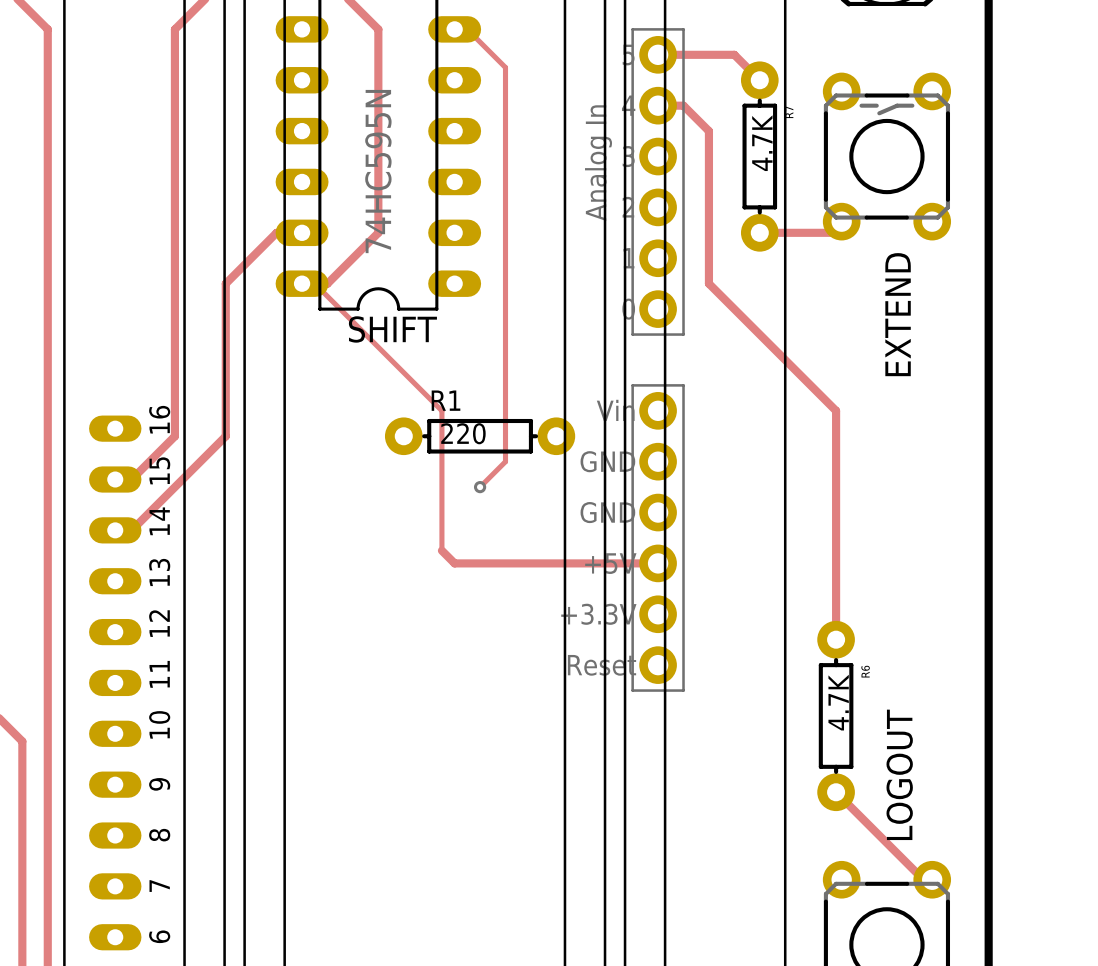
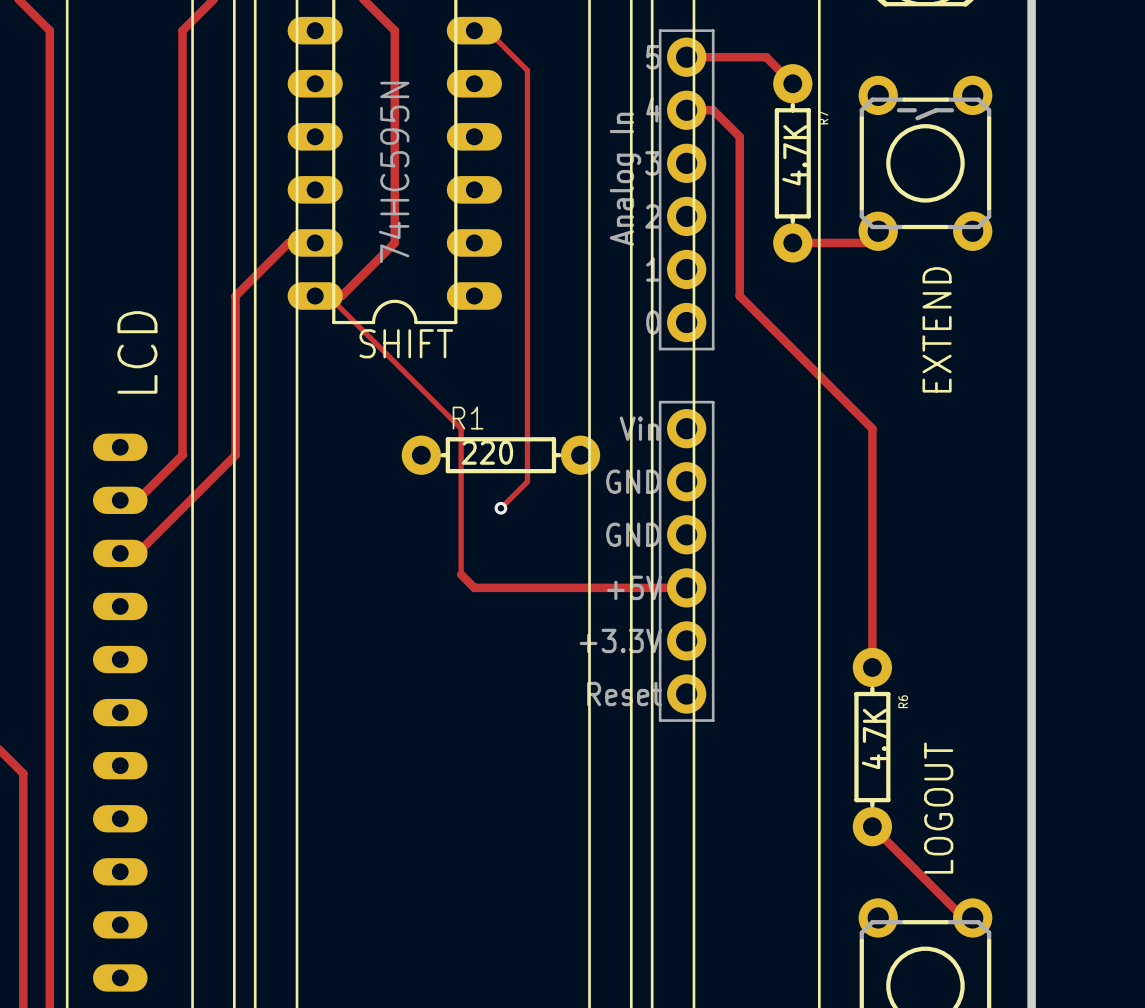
text: none -> LCD (137, 352)
text: 16 (159, 419) -> none
text: 15 (159, 470) -> none
text: 14 (159, 521) -> none
text: 13 (159, 572) -> none
text: 12 (159, 623) -> none
text: 11 (159, 674) -> none
text: 10 (159, 724) -> none
text: 9 (159, 784) -> none
text: 8 (159, 835) -> none
text: 7 (159, 886) -> none
text: 6 (159, 936) -> none

